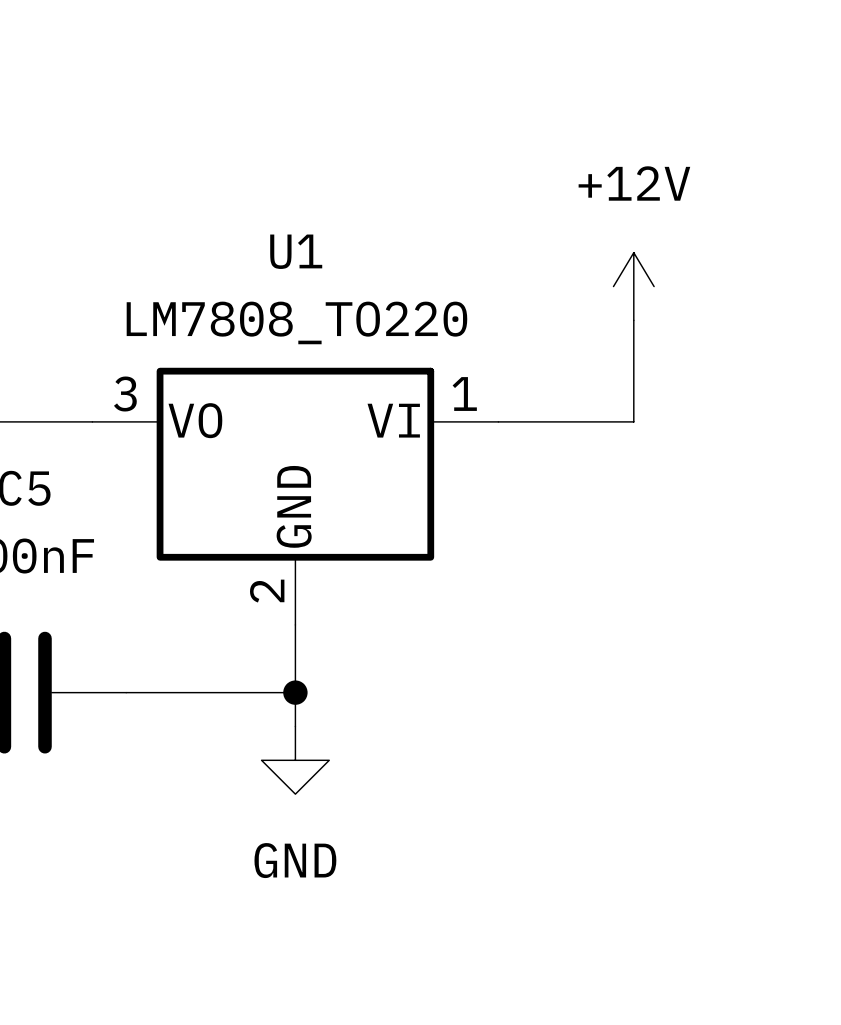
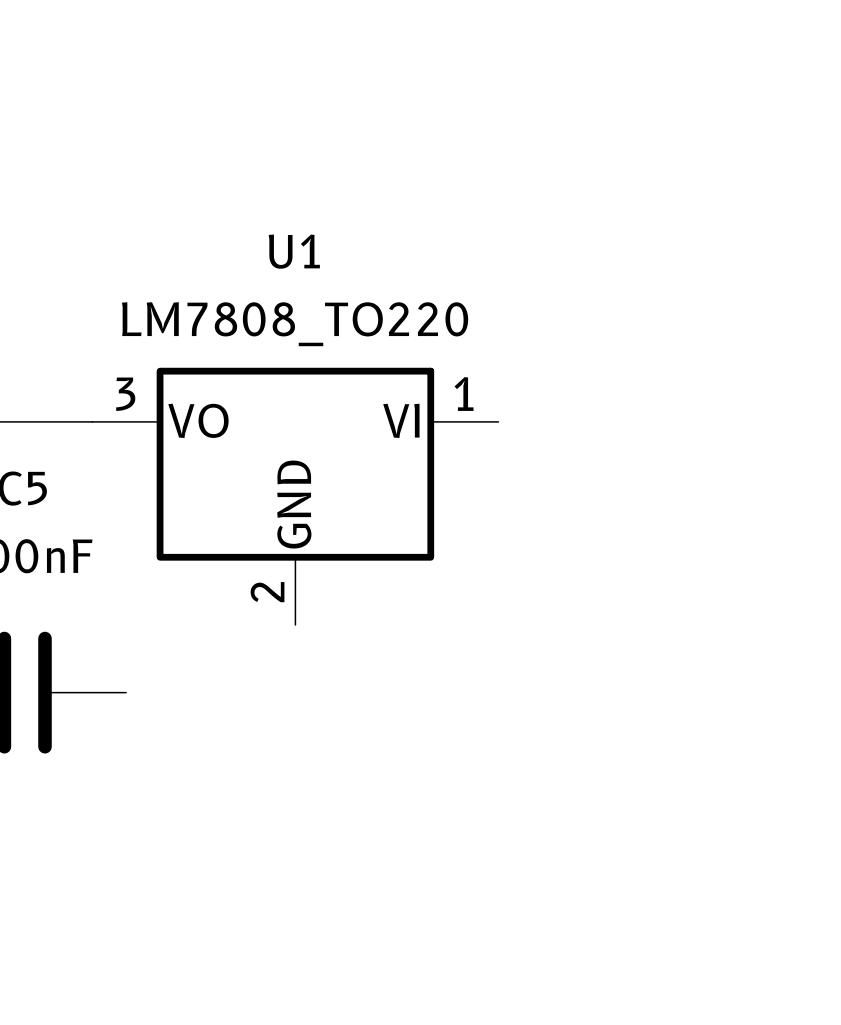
power symbol: +12V (633, 286) -> none
wire: (633, 320) (633, 421) (498, 421) -> none
wire: (295, 624) (295, 726) -> none
wire: (126, 692) (295, 692) -> none
junction: (295, 692) -> none
power symbol: GND (295, 760) -> none

